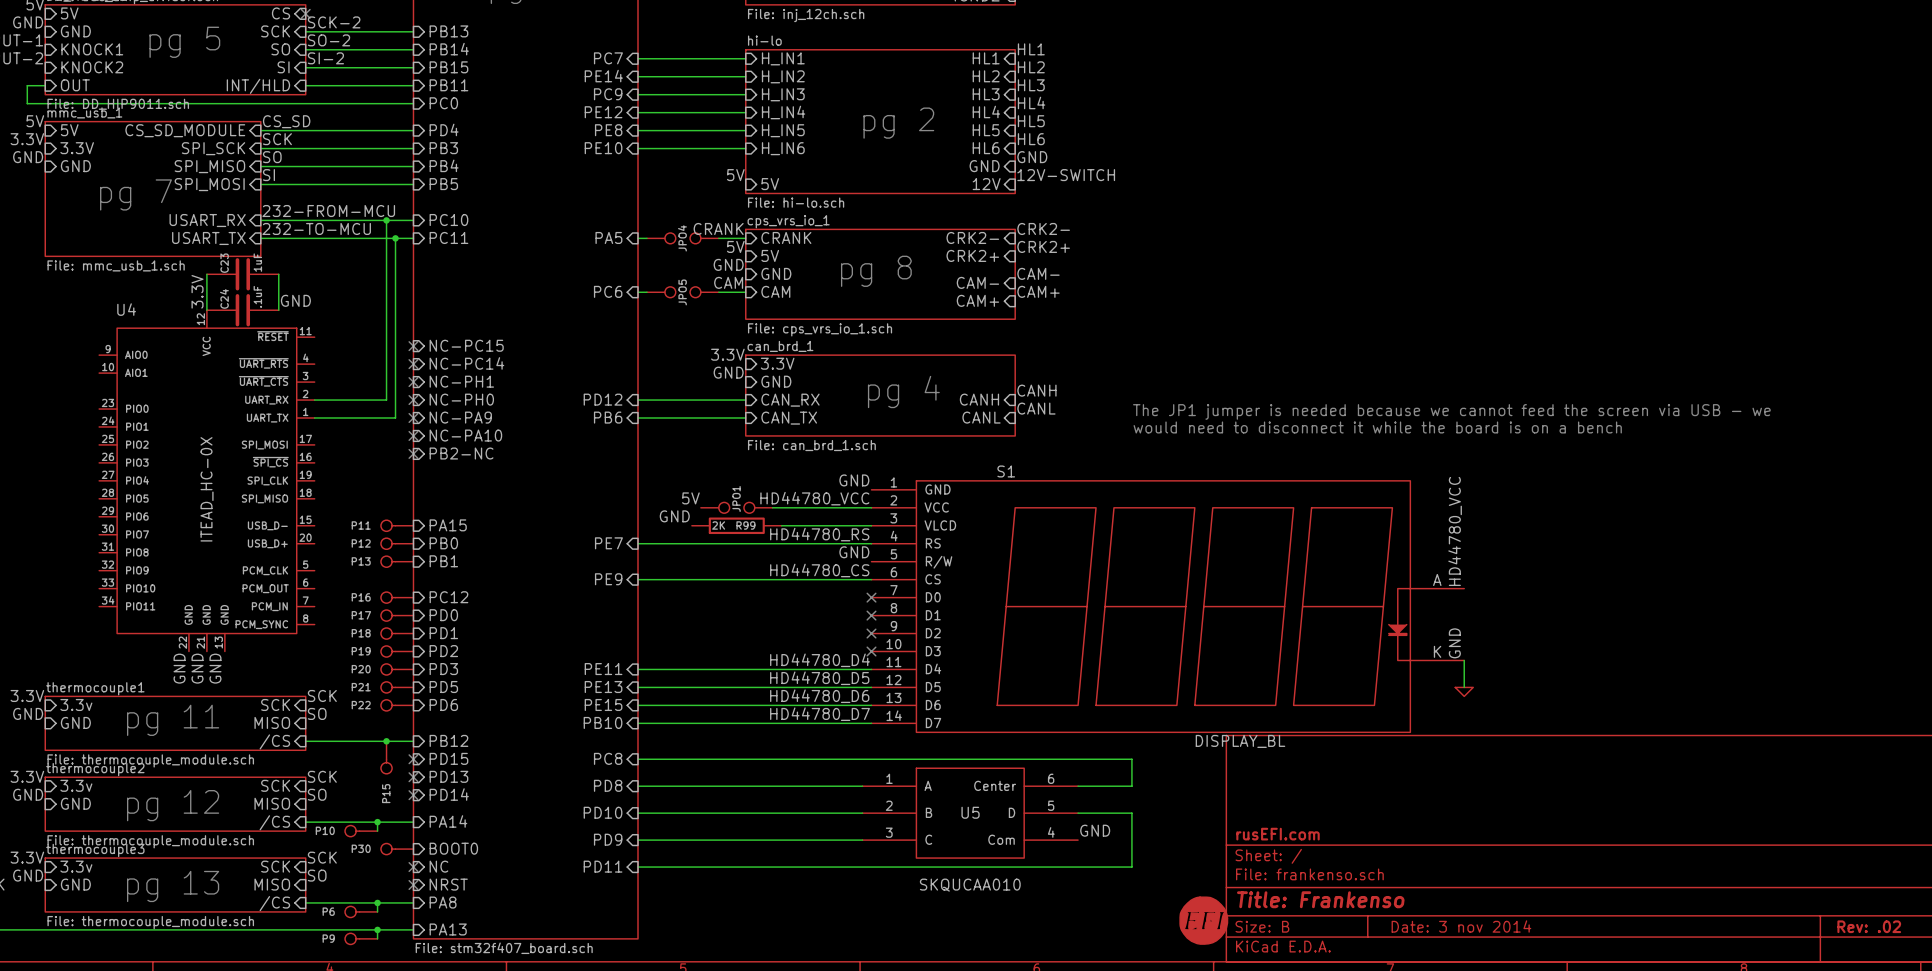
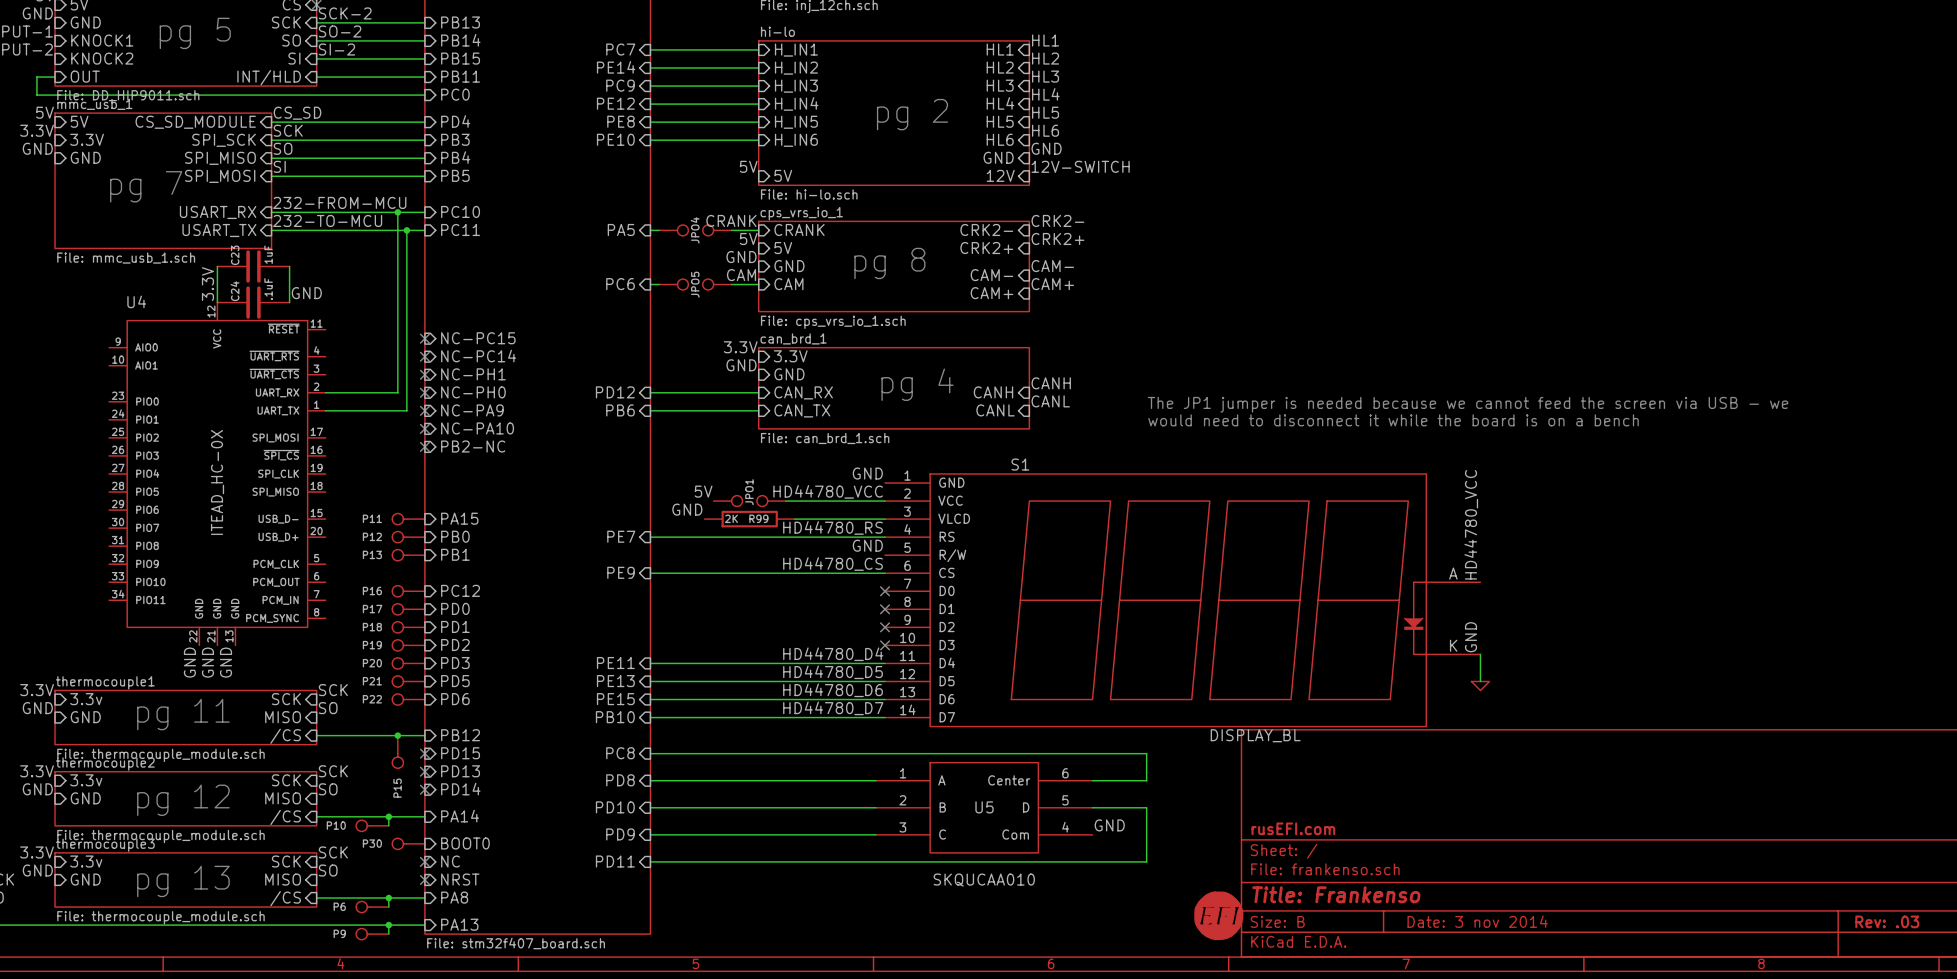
title block: Rev: .02 (1869, 926) -> Rev: .03 (1887, 921)

